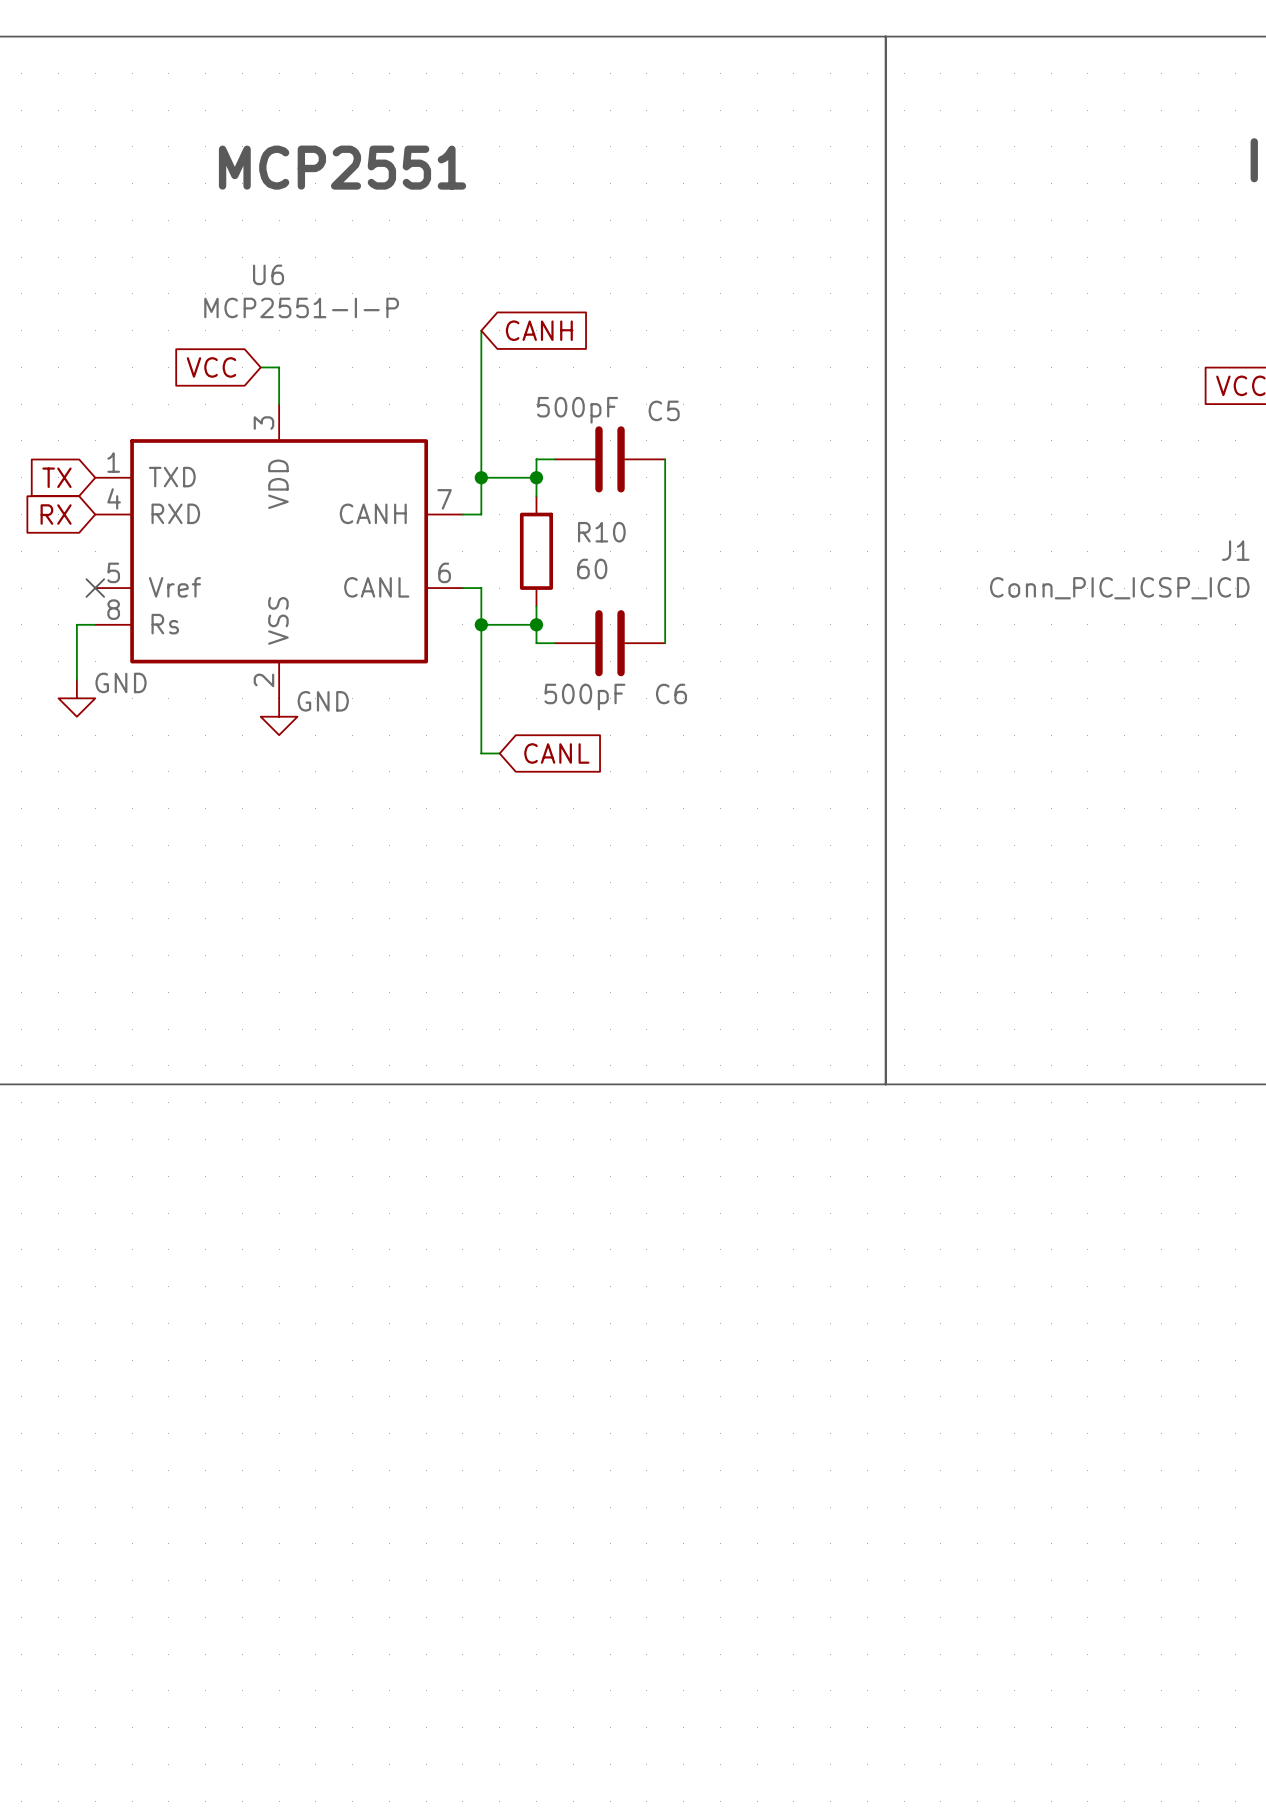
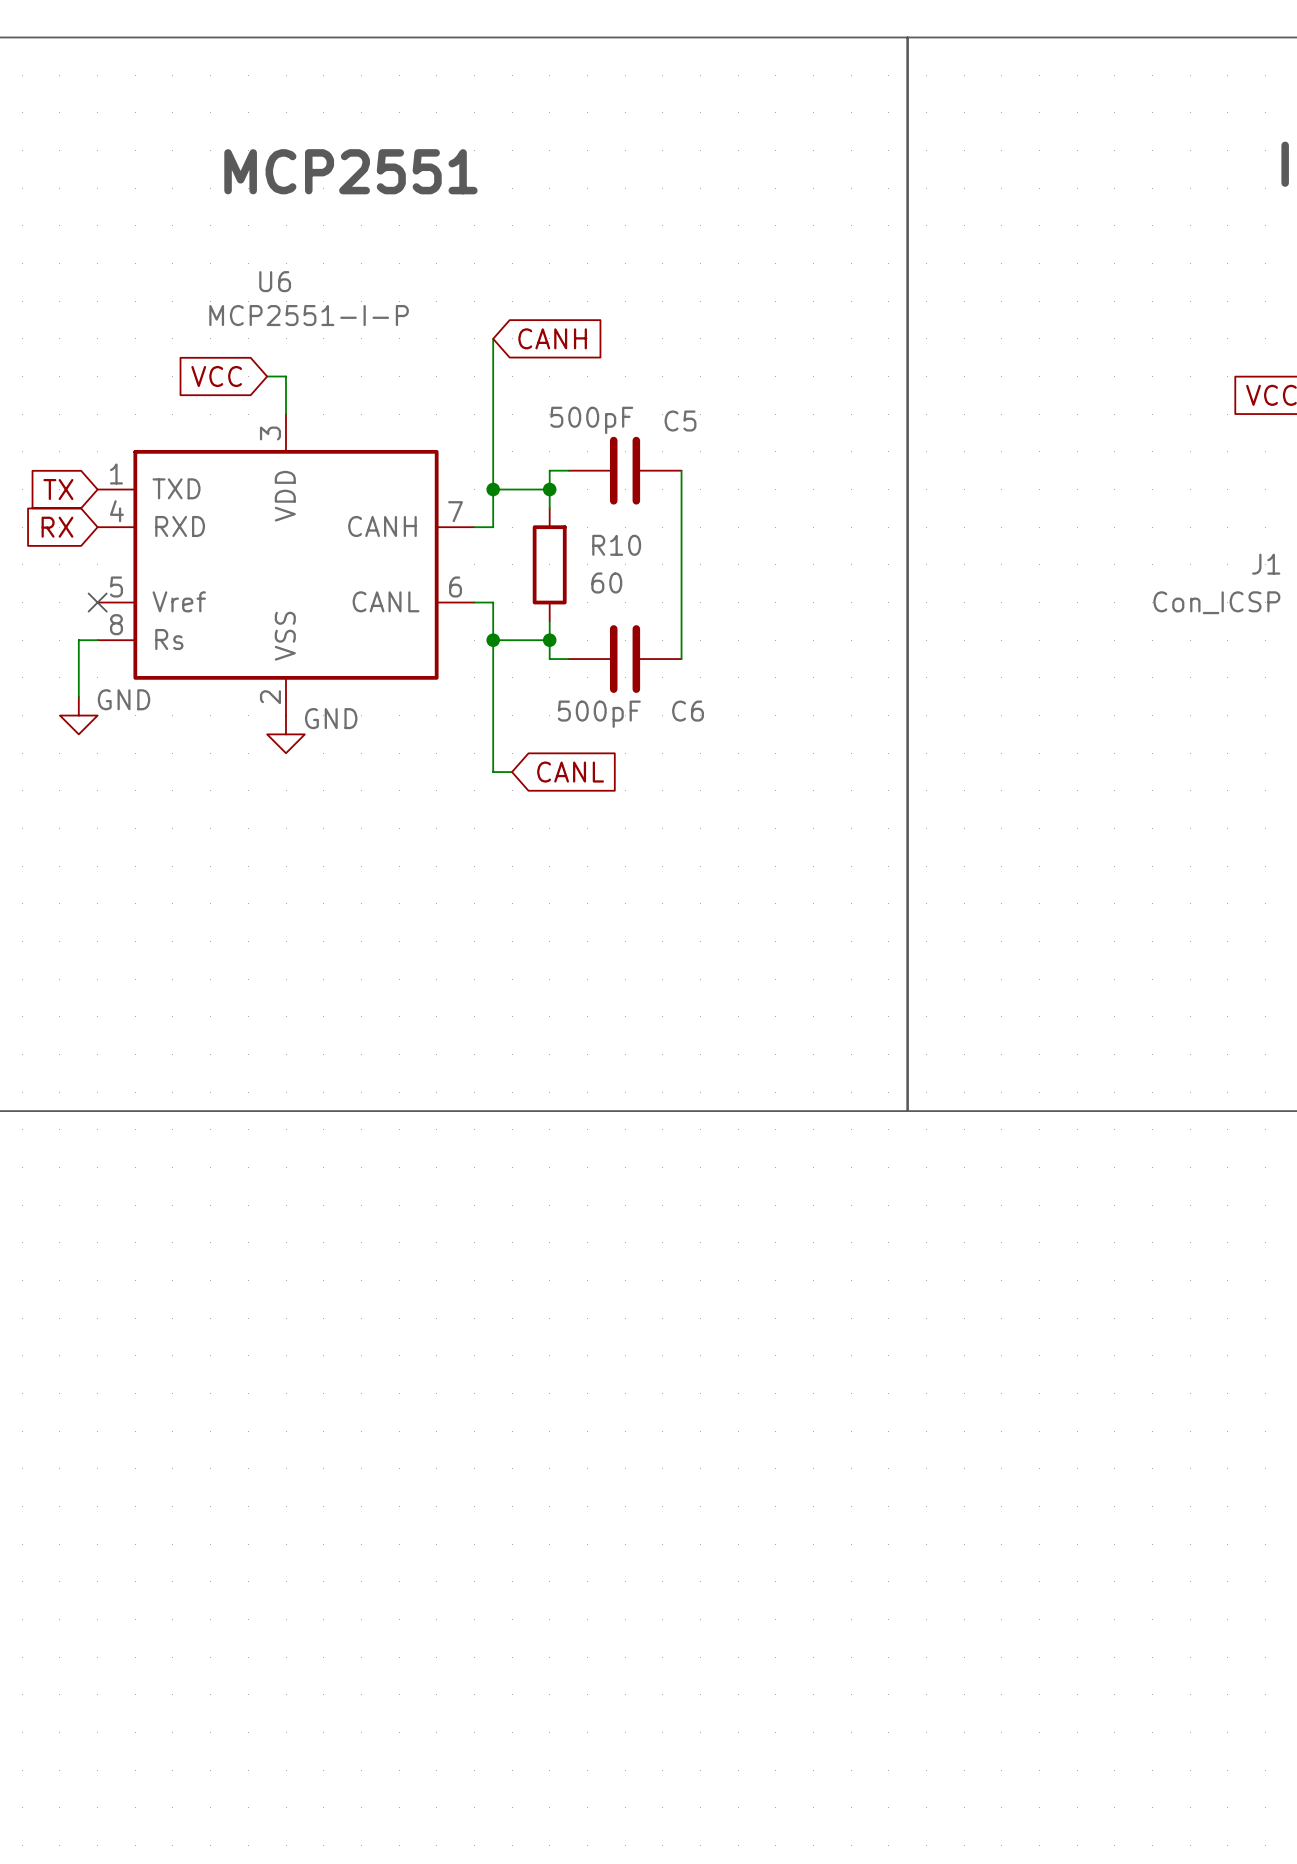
J1 value: Conn_PIC_ICSP_ICD (1119, 588) -> Con_ICSP (1216, 602)

